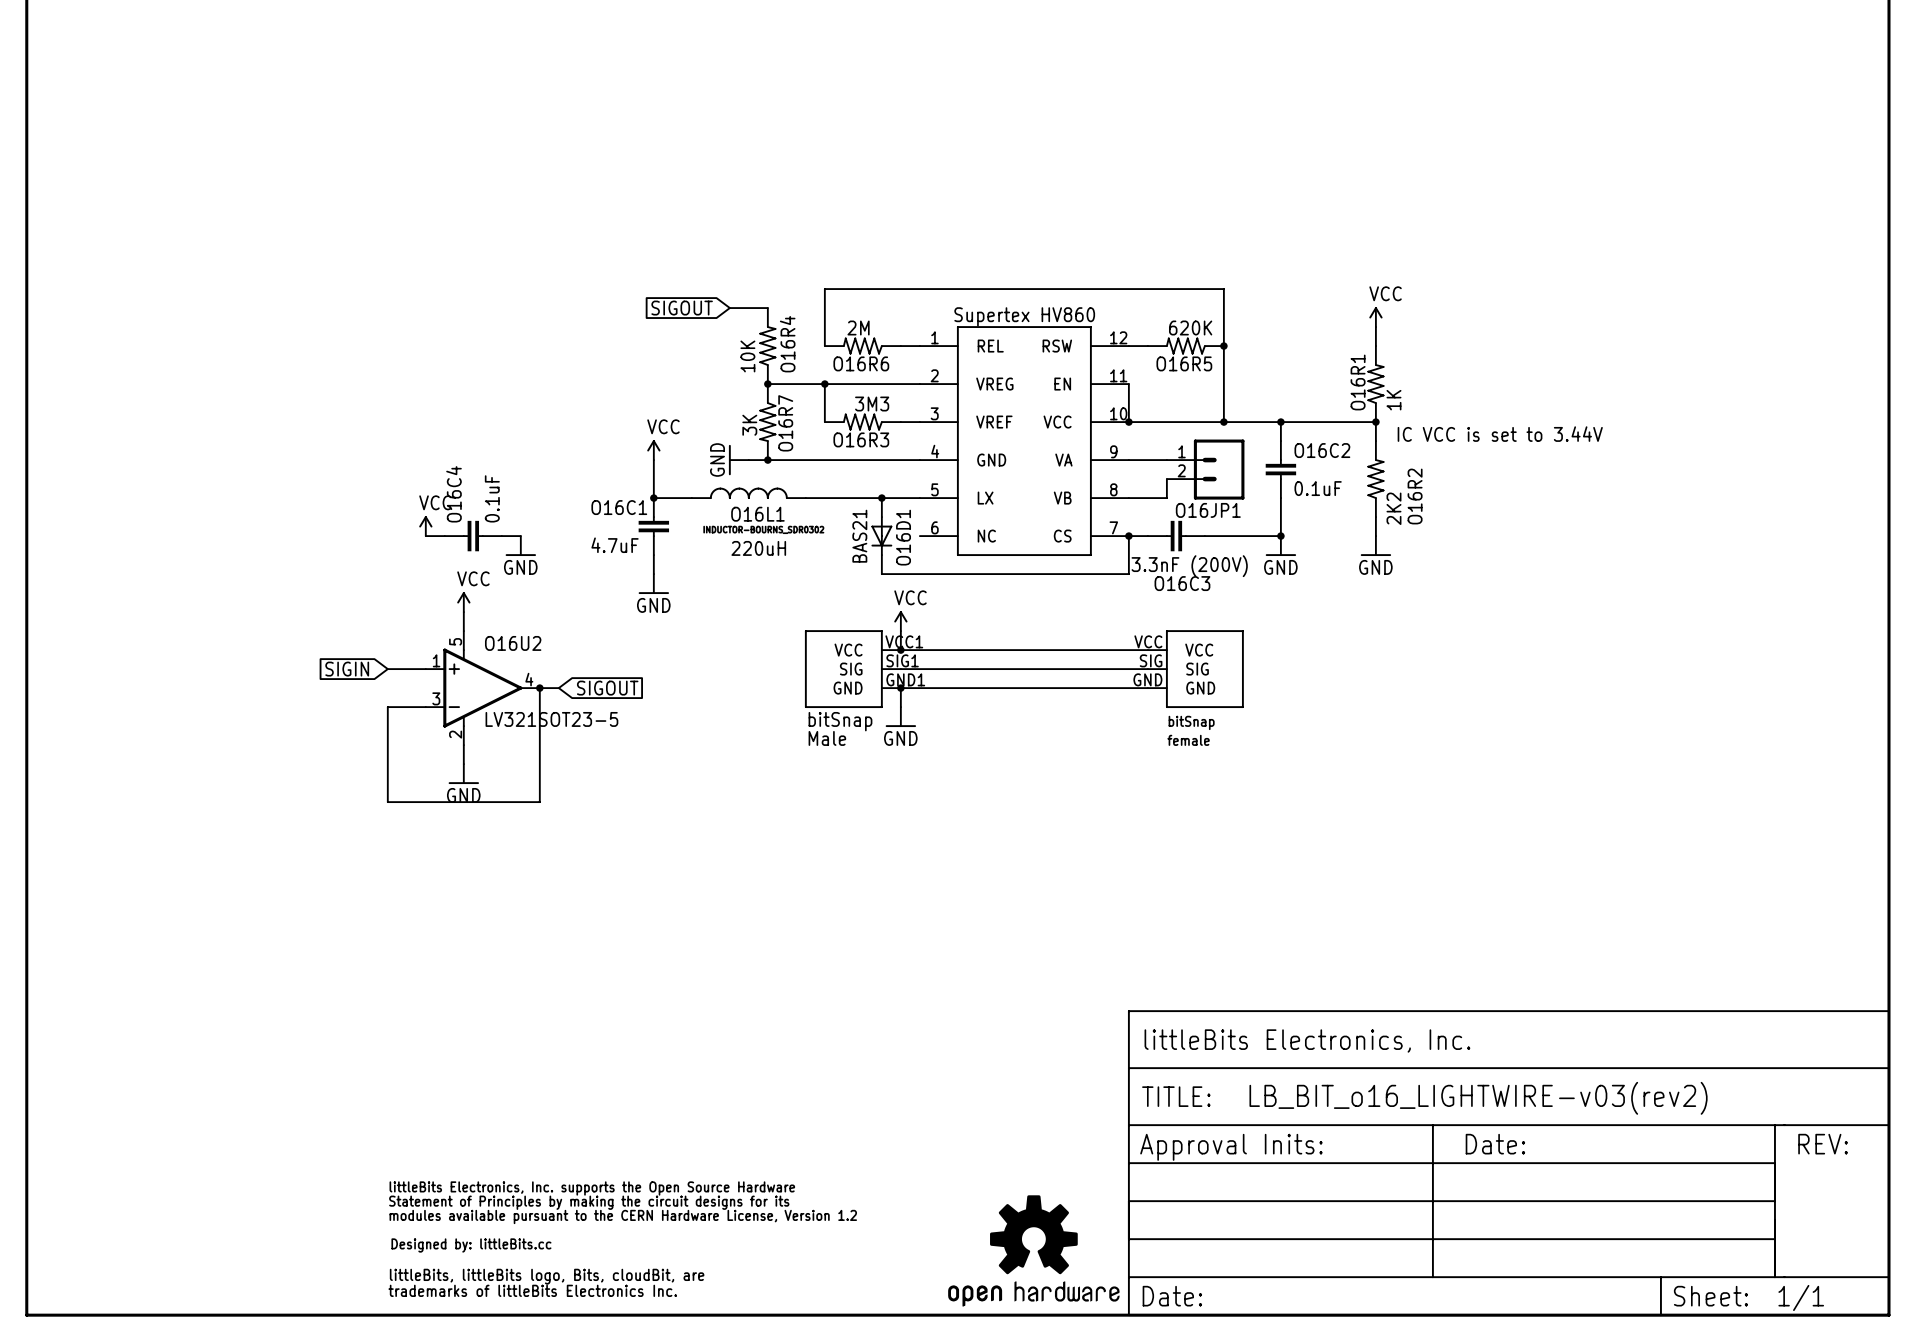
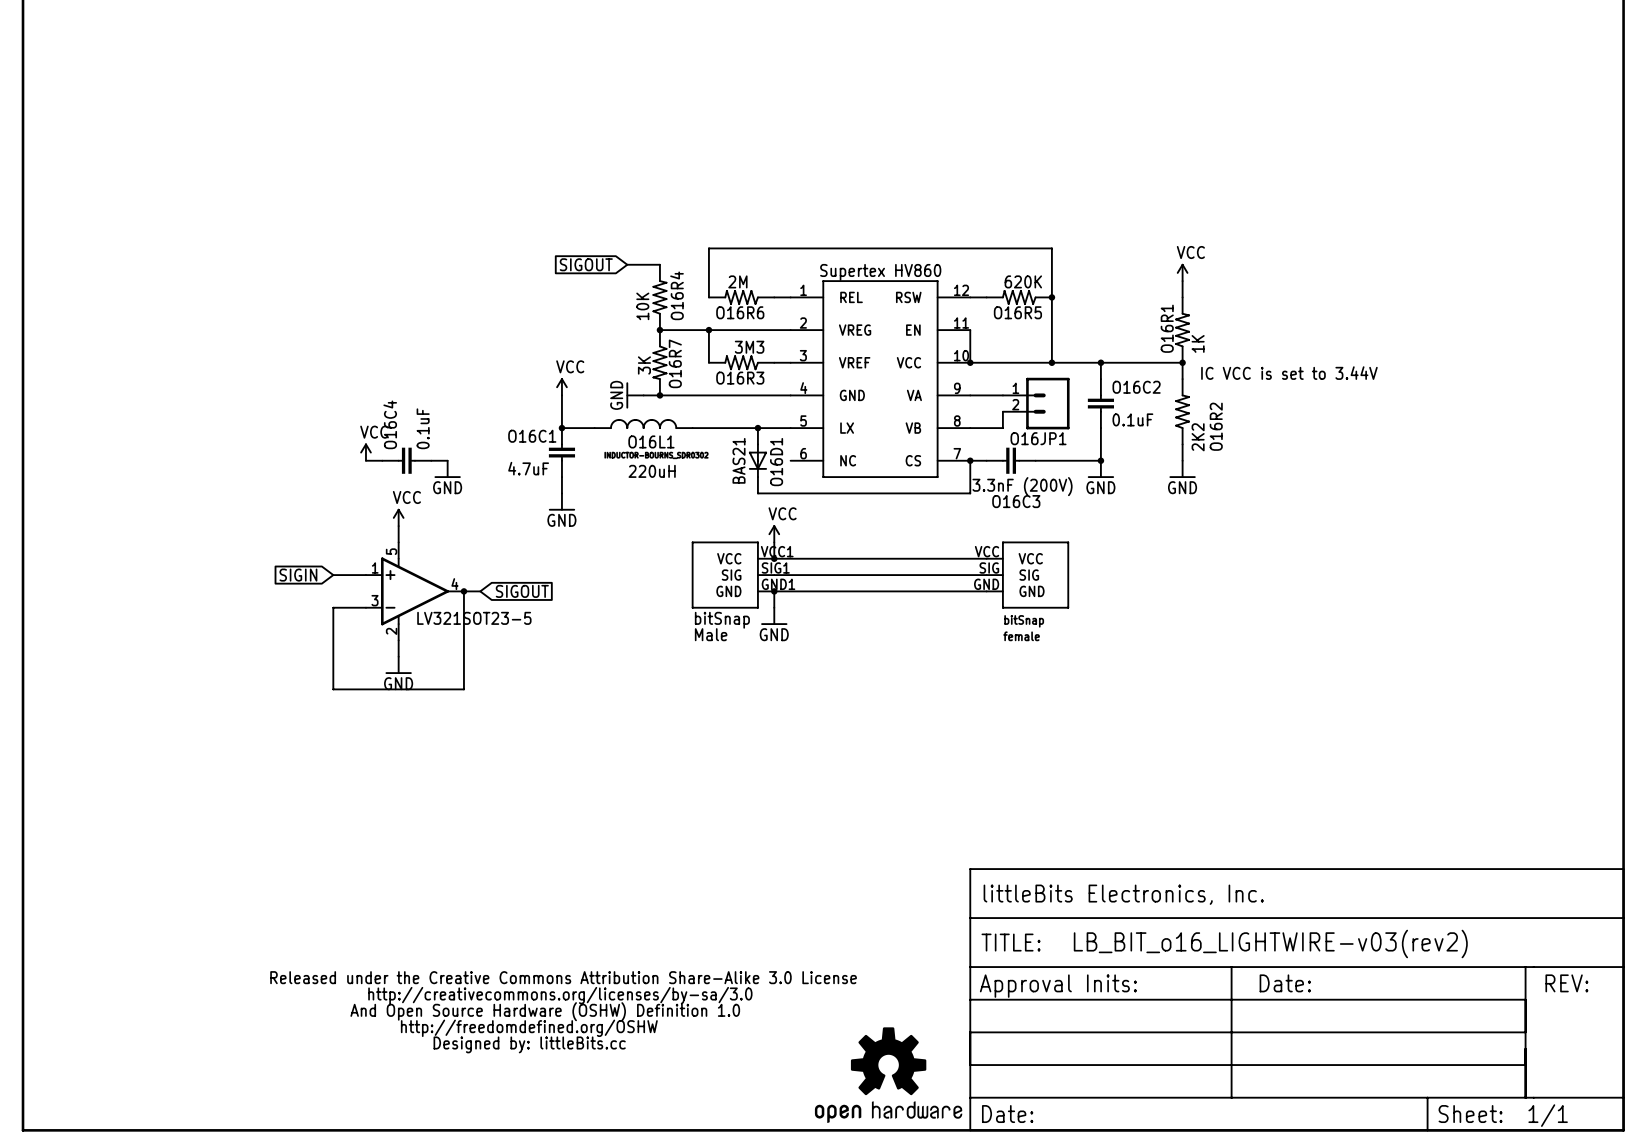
O16U2 name: O16U2 (513, 643) -> none
part: none -> (563, 1012)
part: (622, 1239) -> none

